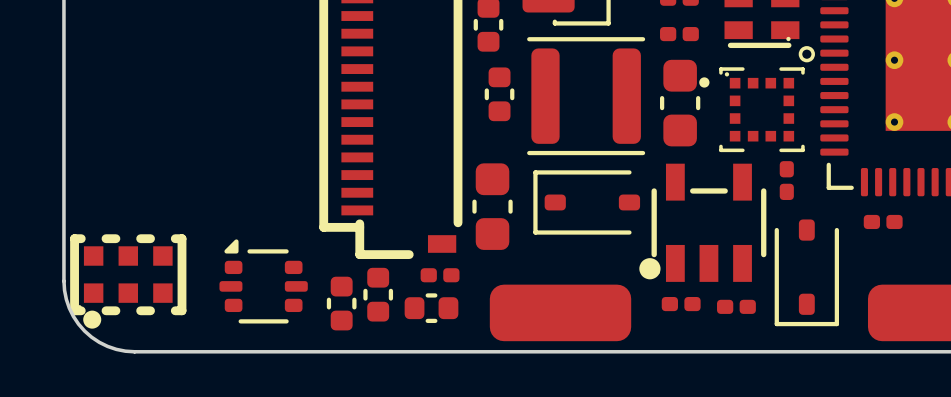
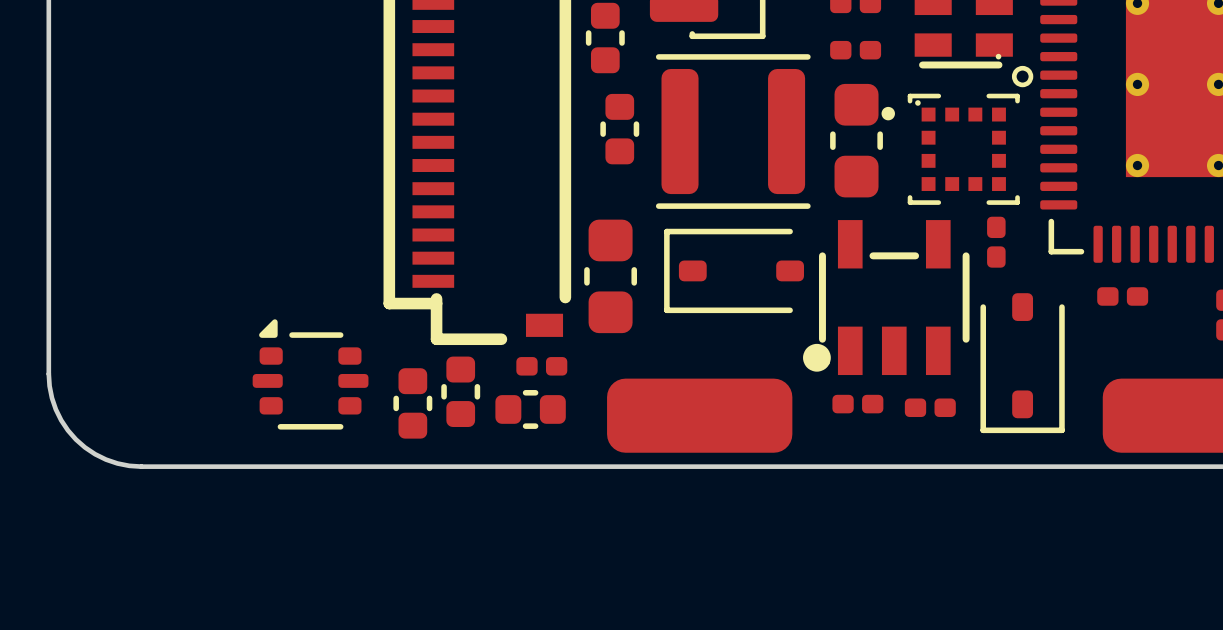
part: (128, 281) -> none

